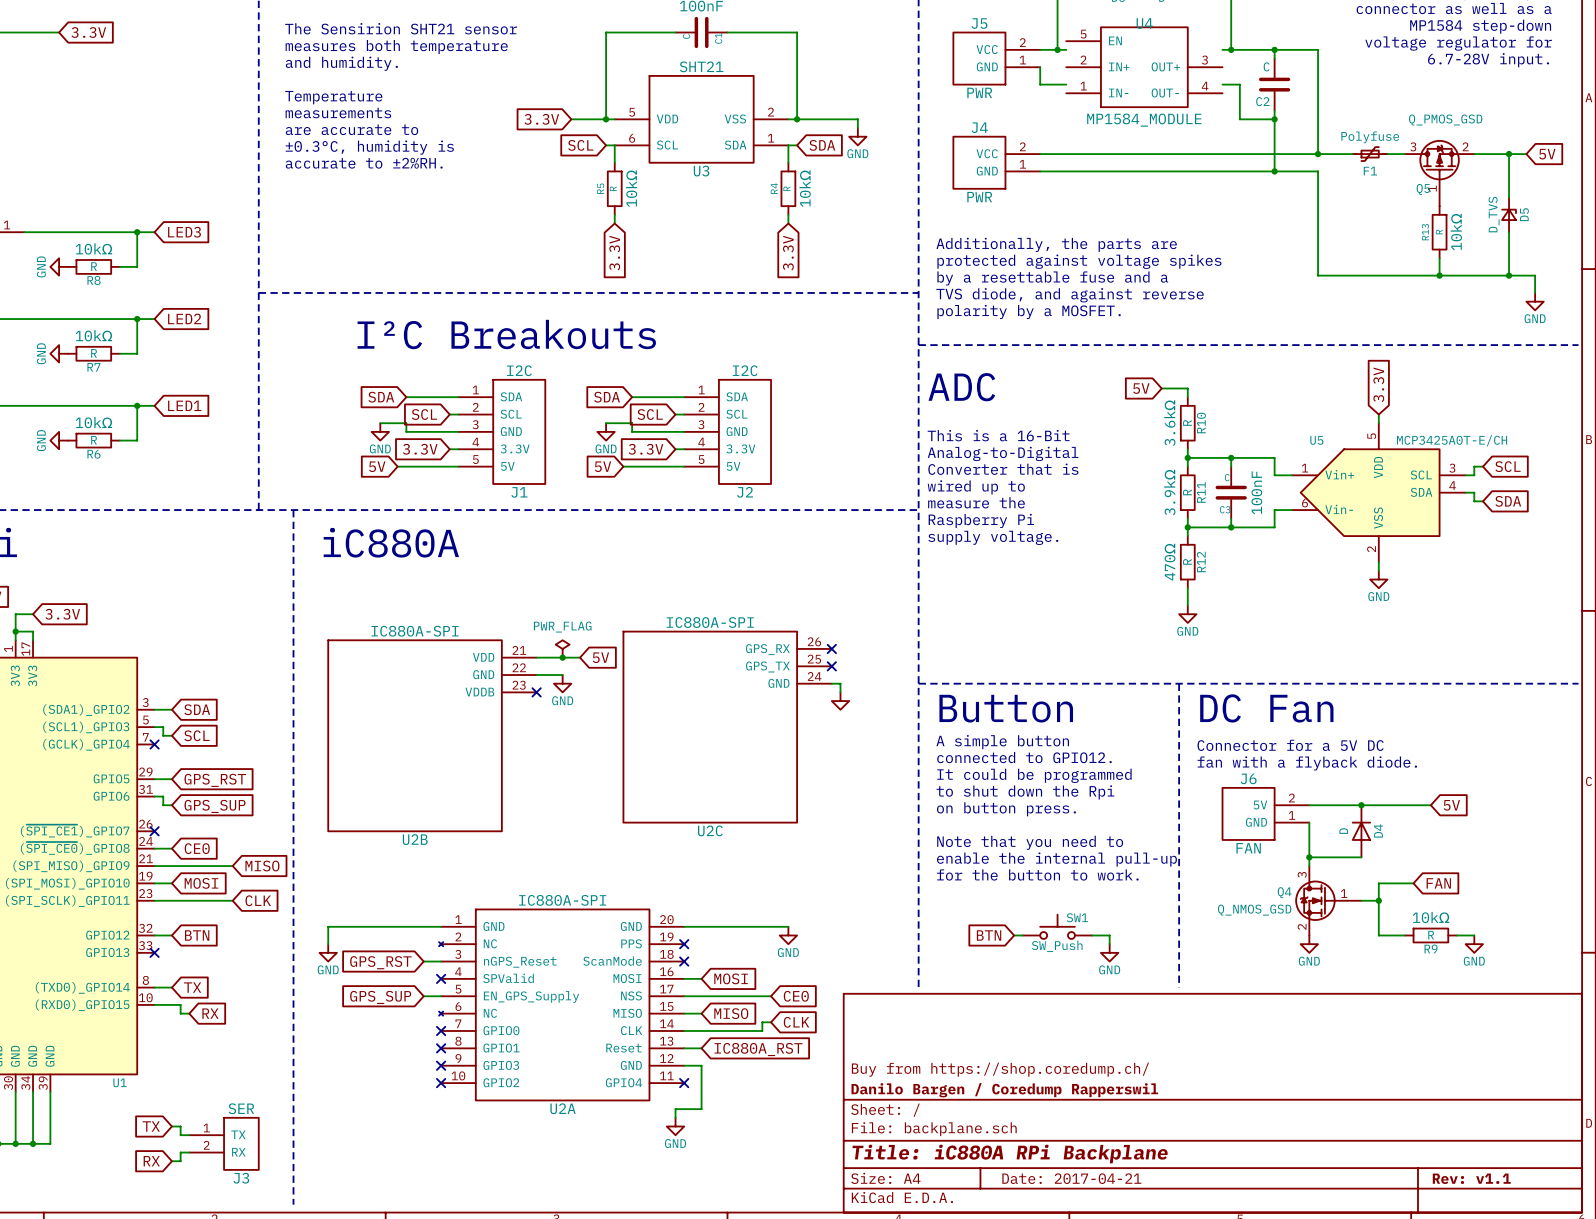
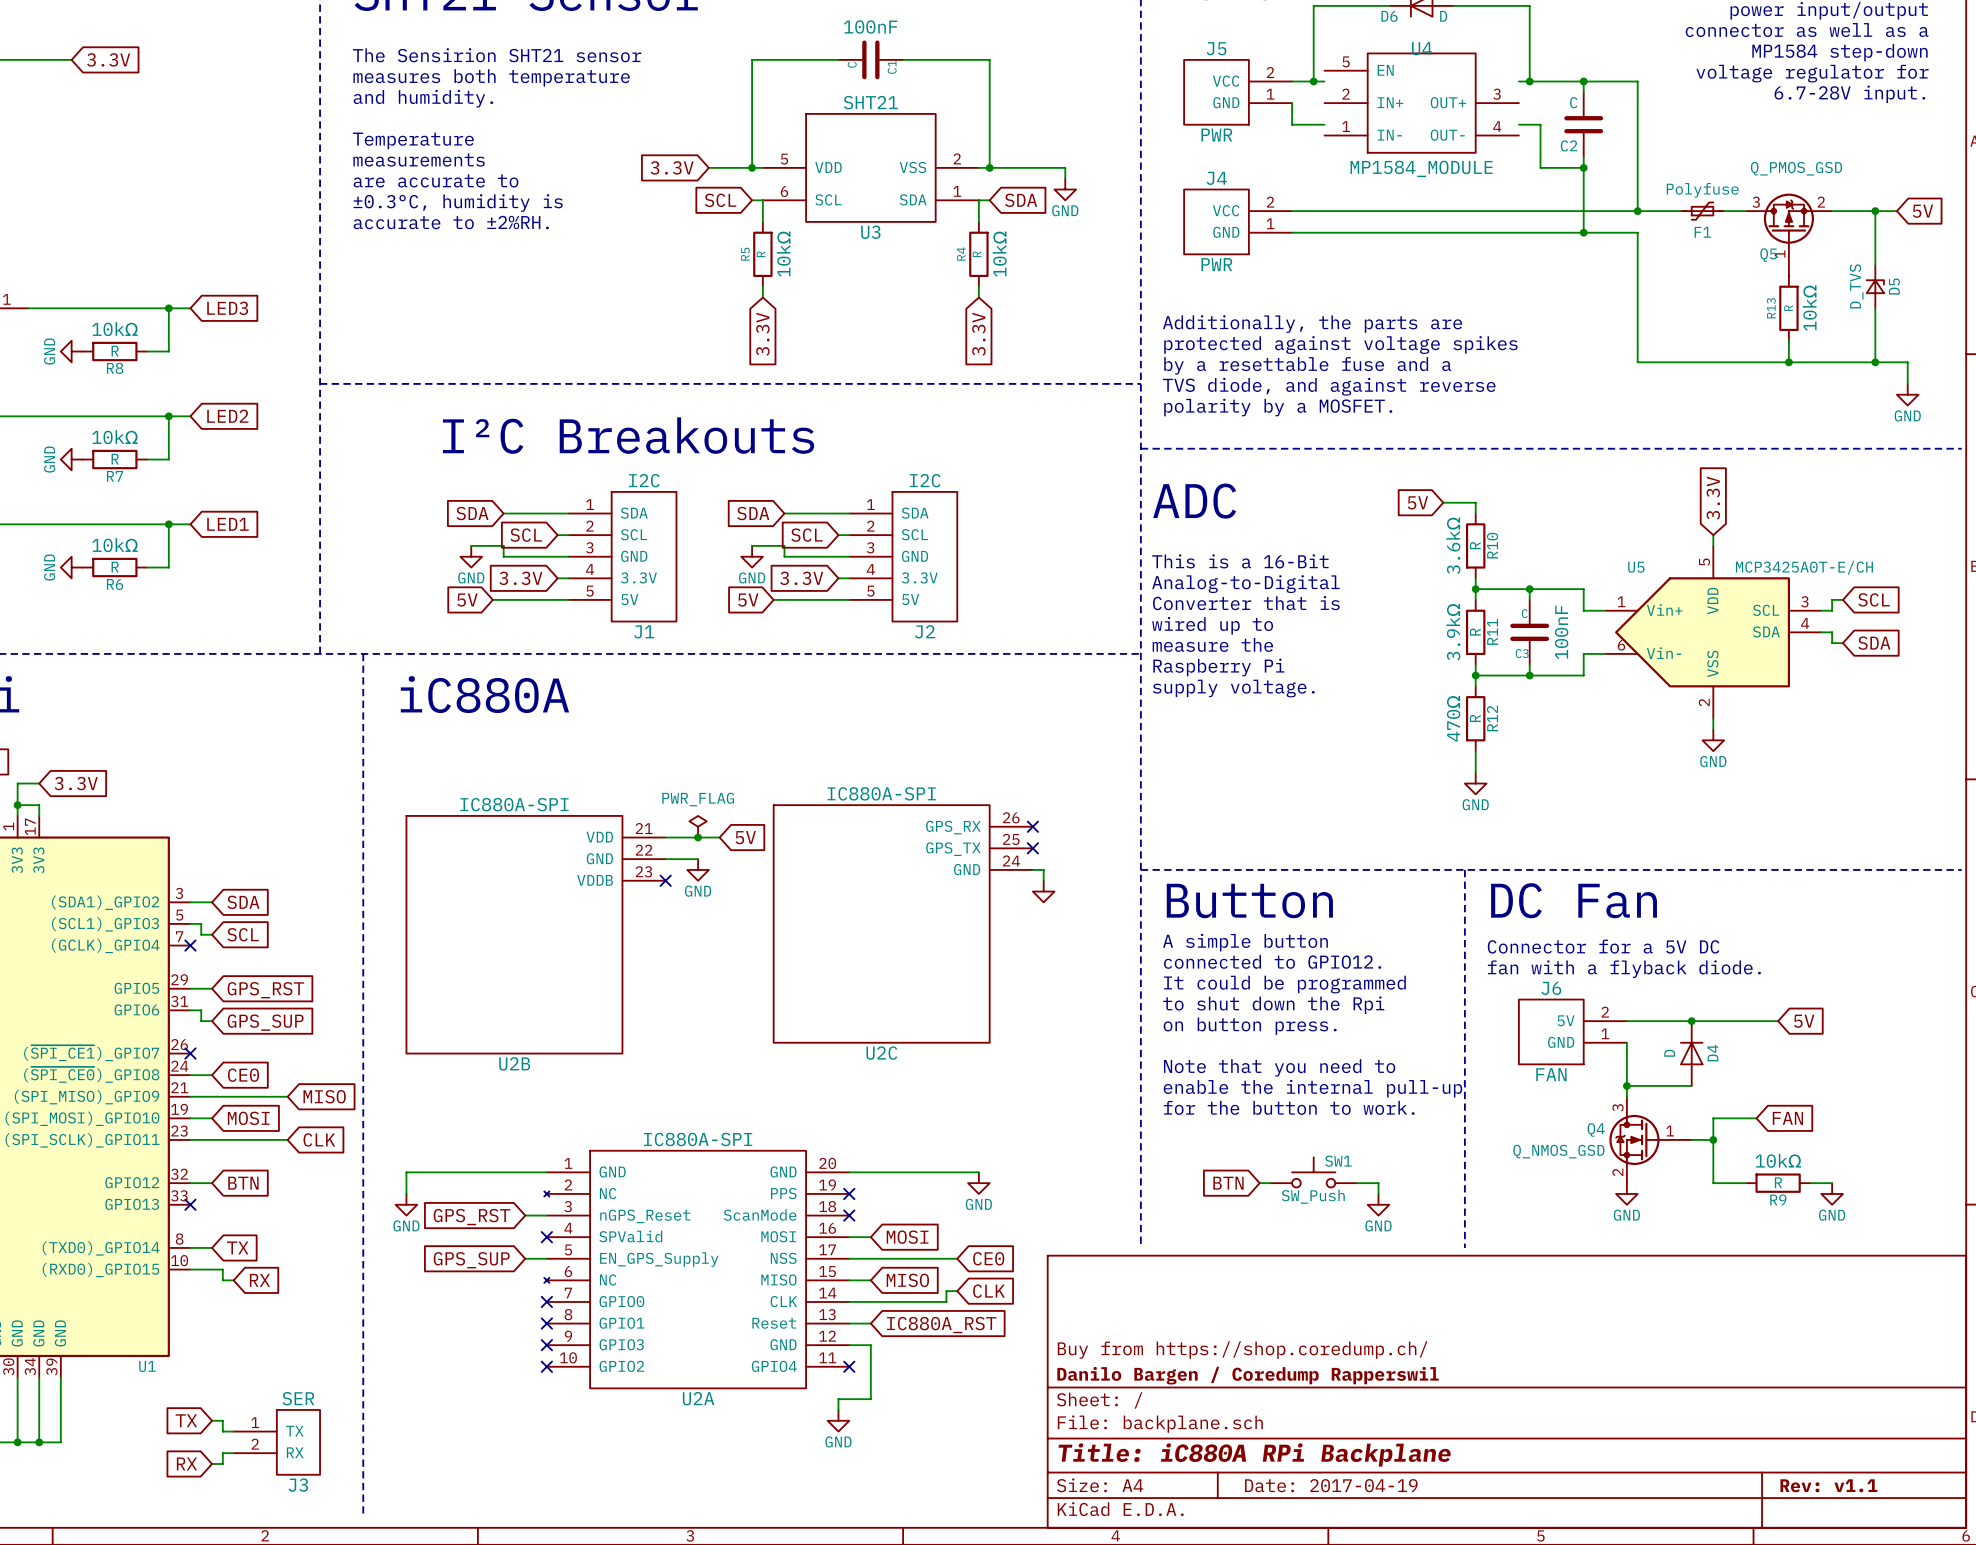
title block: Date: 2017-04-21 (1071, 1178) -> Date: 2017-04-19 (1331, 1485)

